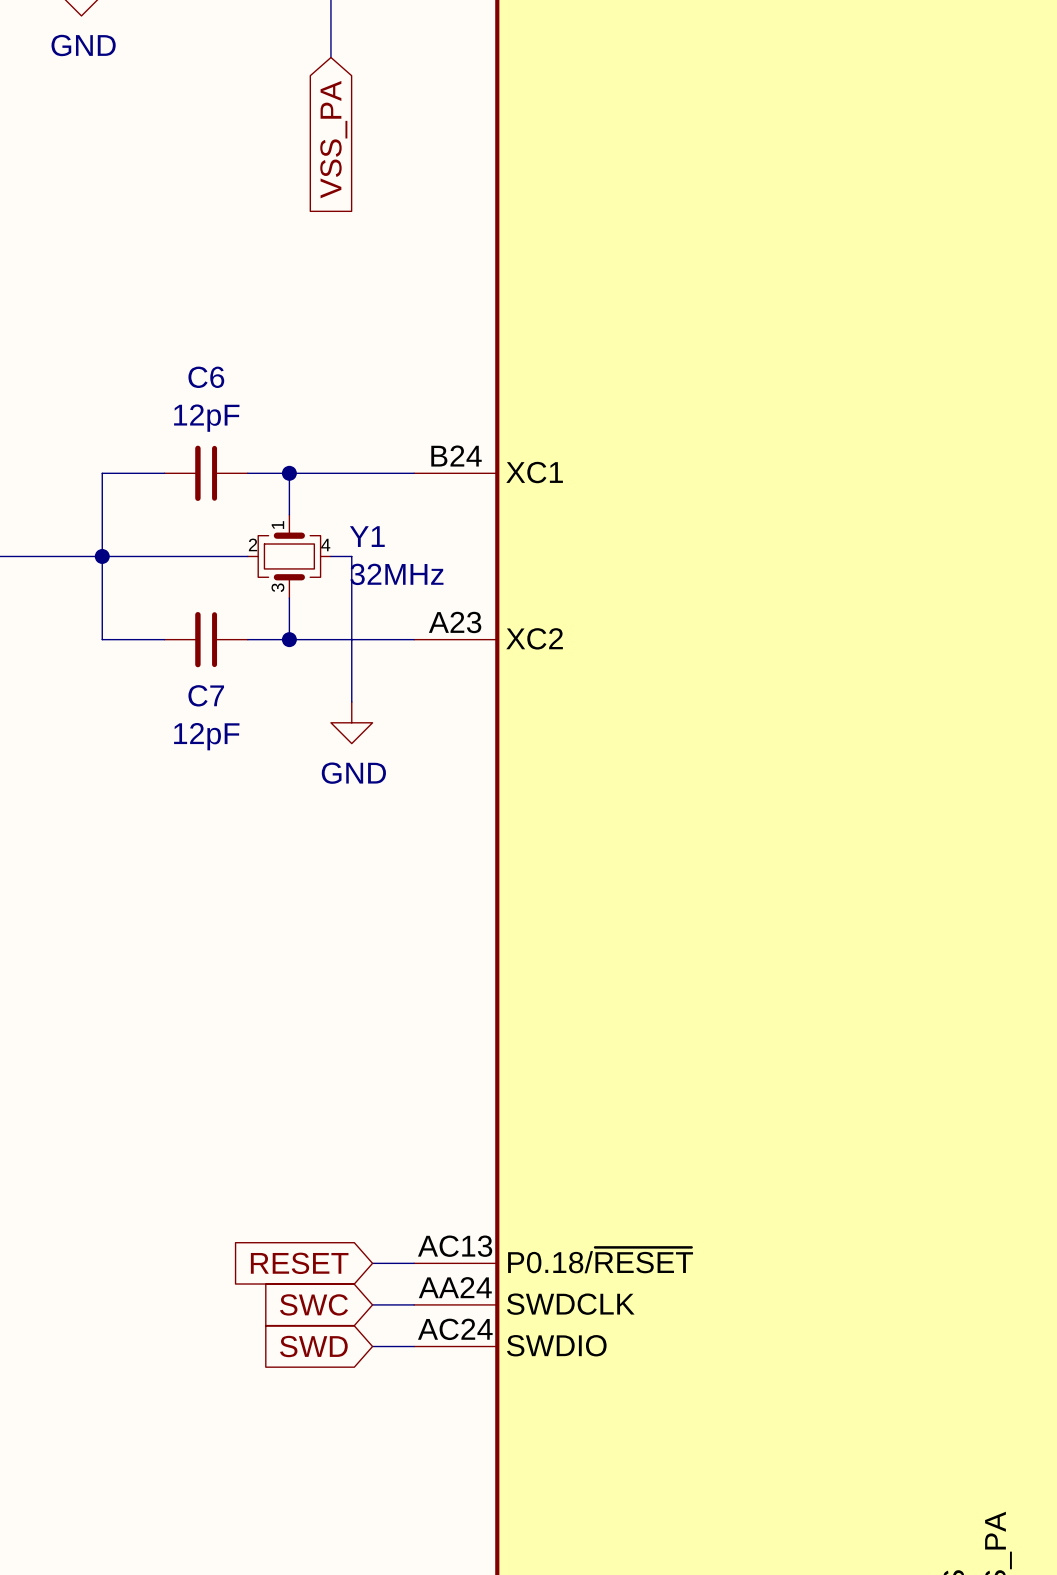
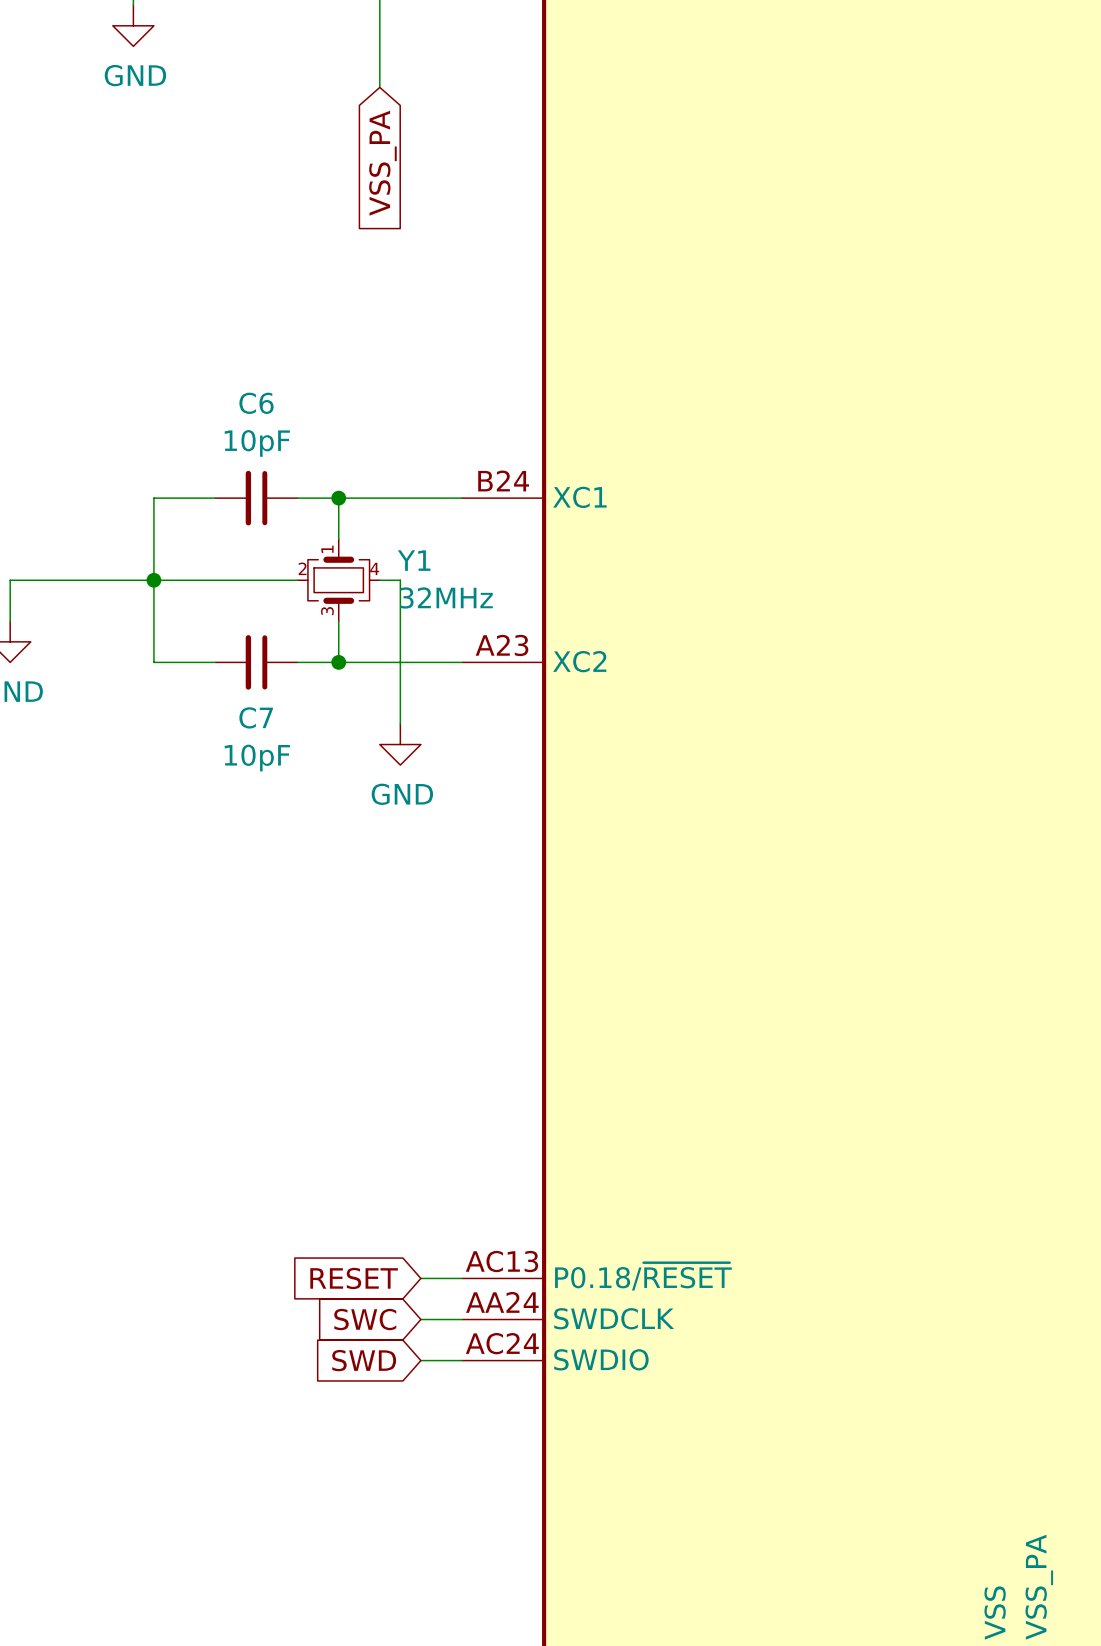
C6 value: 12pF (206, 418) -> 10pF (257, 443)
C7 value: 12pF (206, 736) -> 10pF (257, 758)

